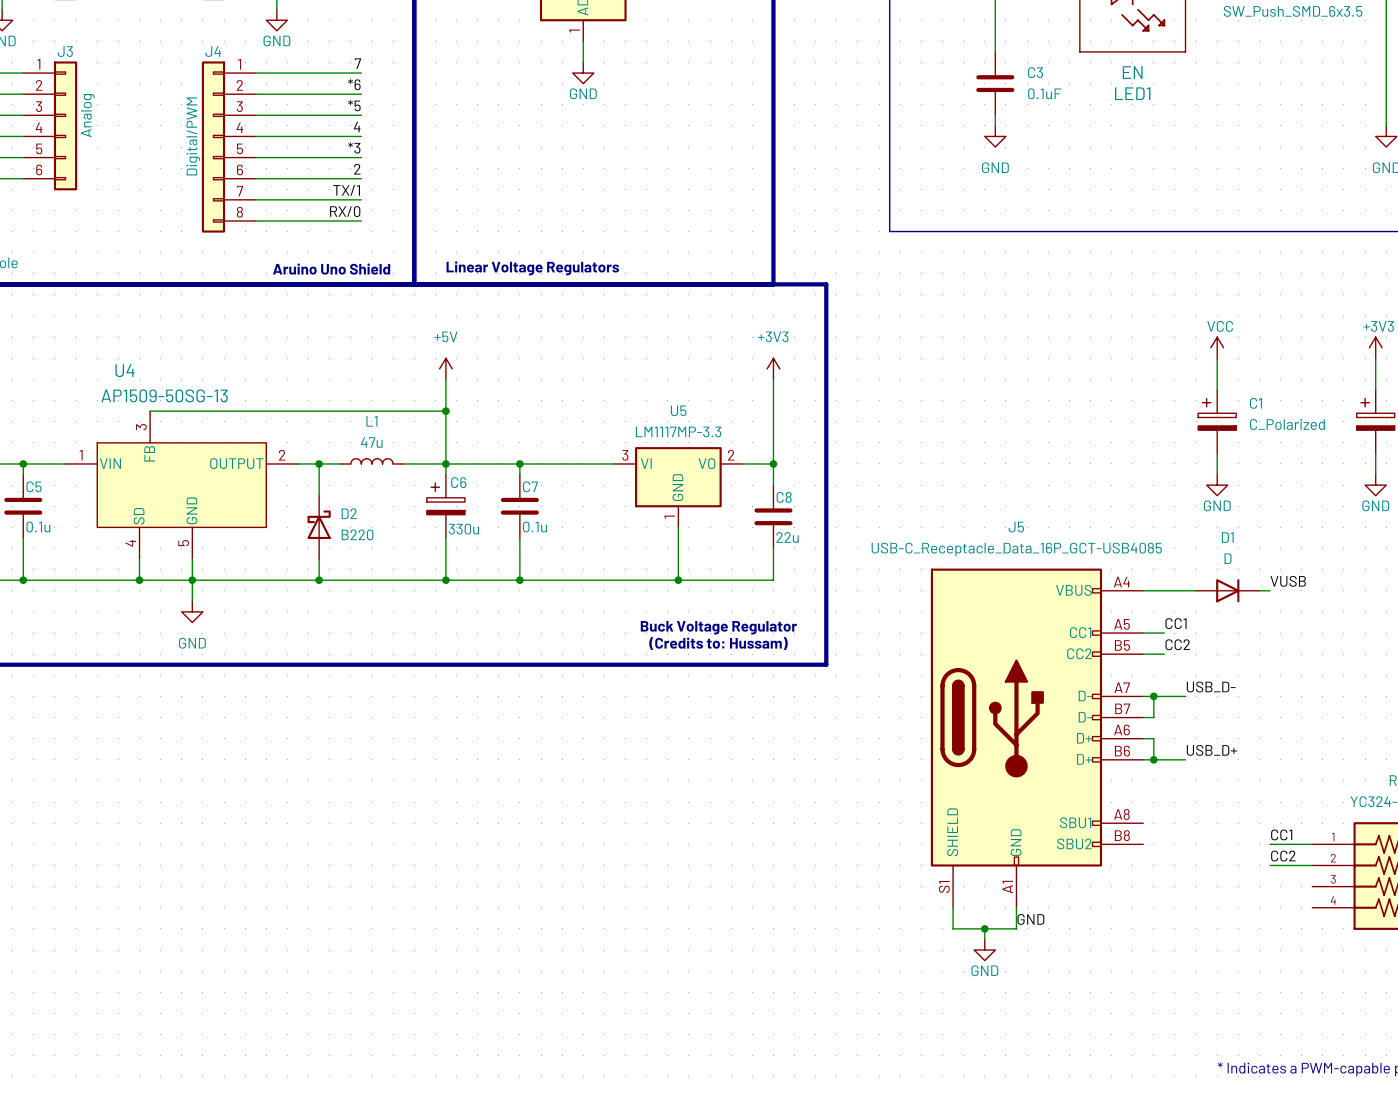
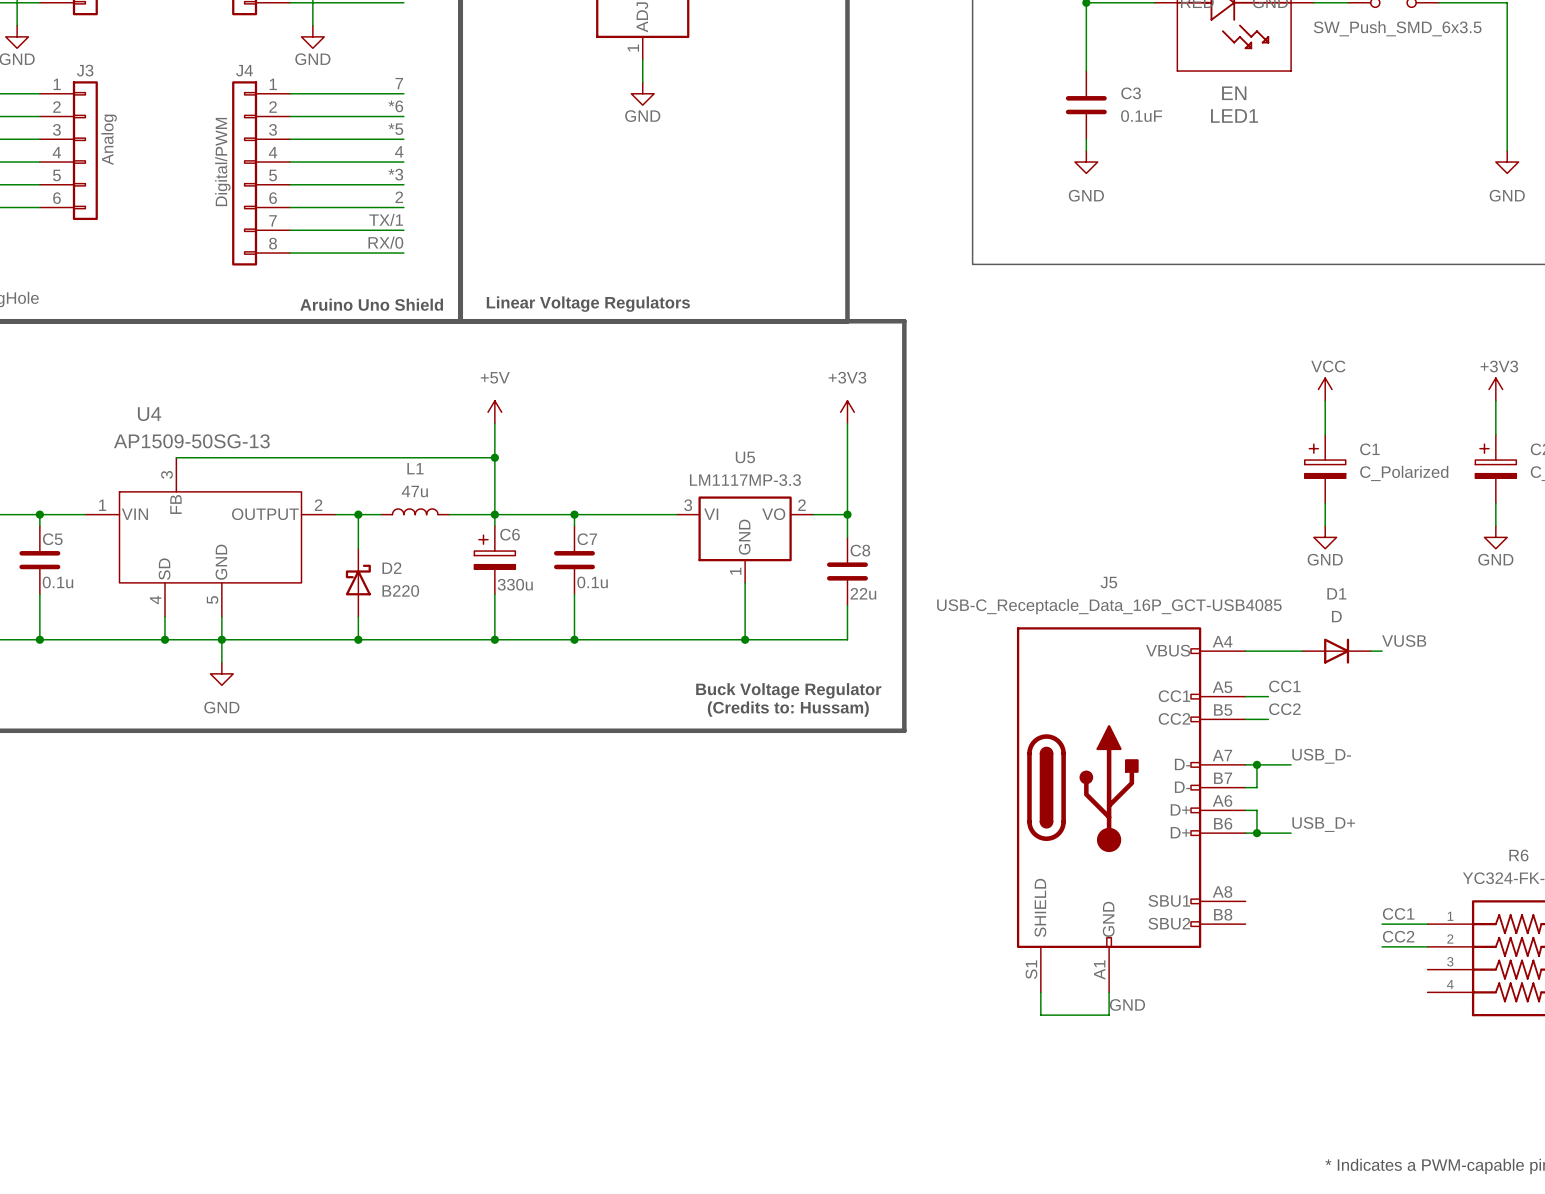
wire: (984, 928) (984, 939) -> none
junction: (984, 928) -> none
power symbol: GND (984, 950) -> none

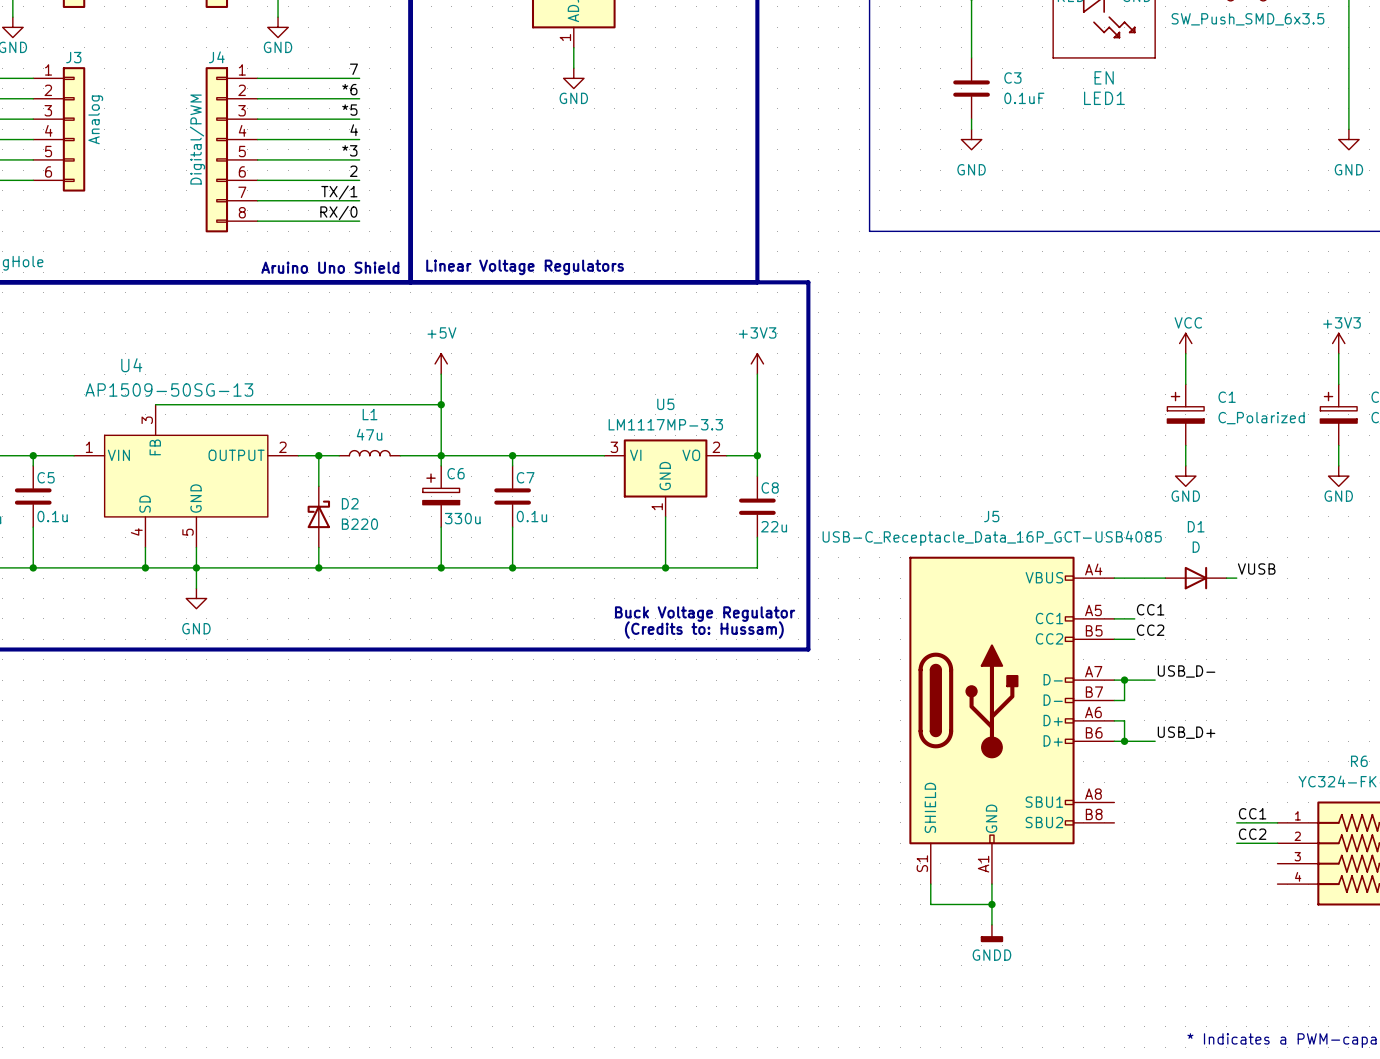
label: GND (1127, 1004) -> none
wire: none -> (991, 904) (991, 924)
junction: none -> (991, 904)
power symbol: none -> GNDD (991, 933)

